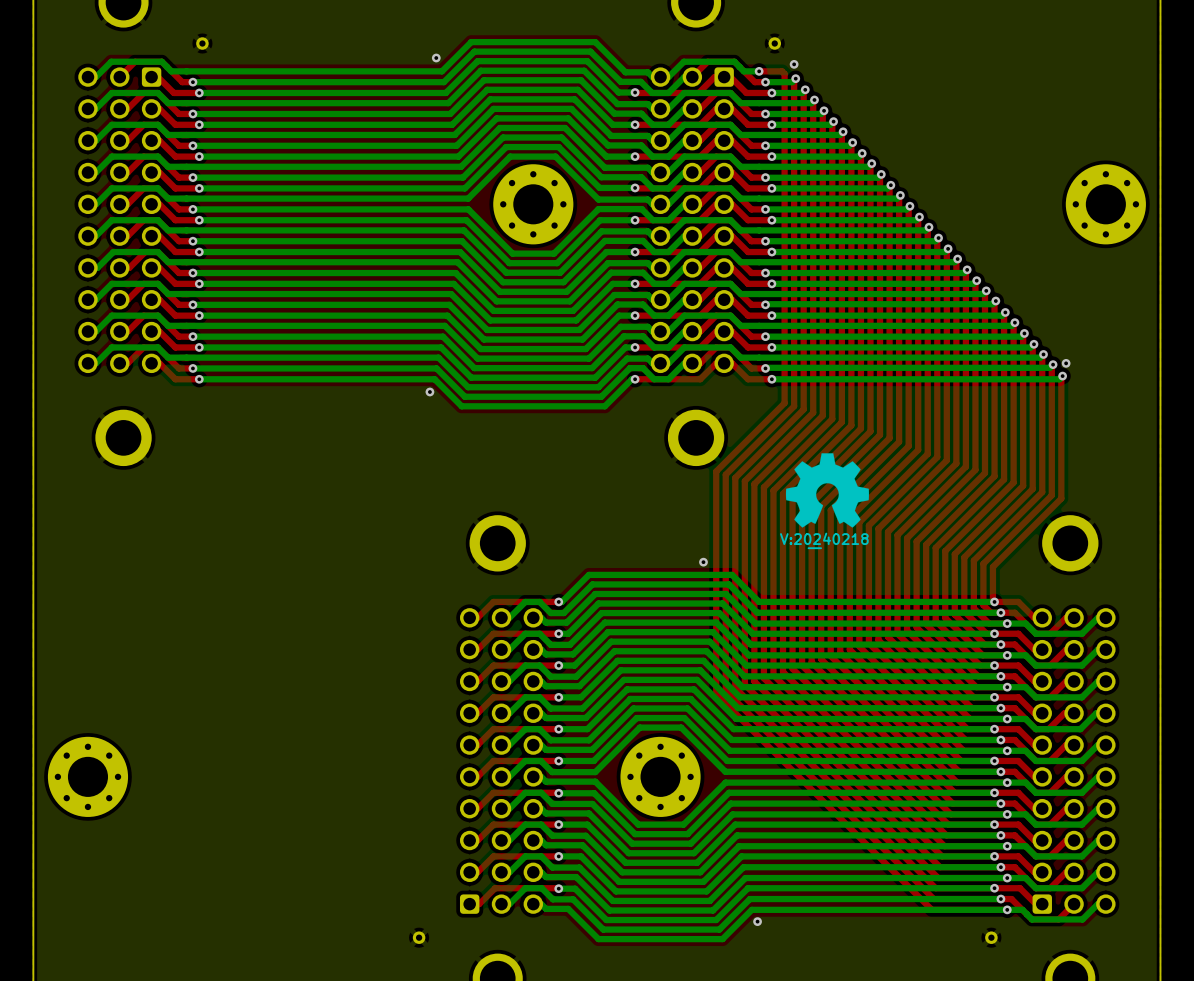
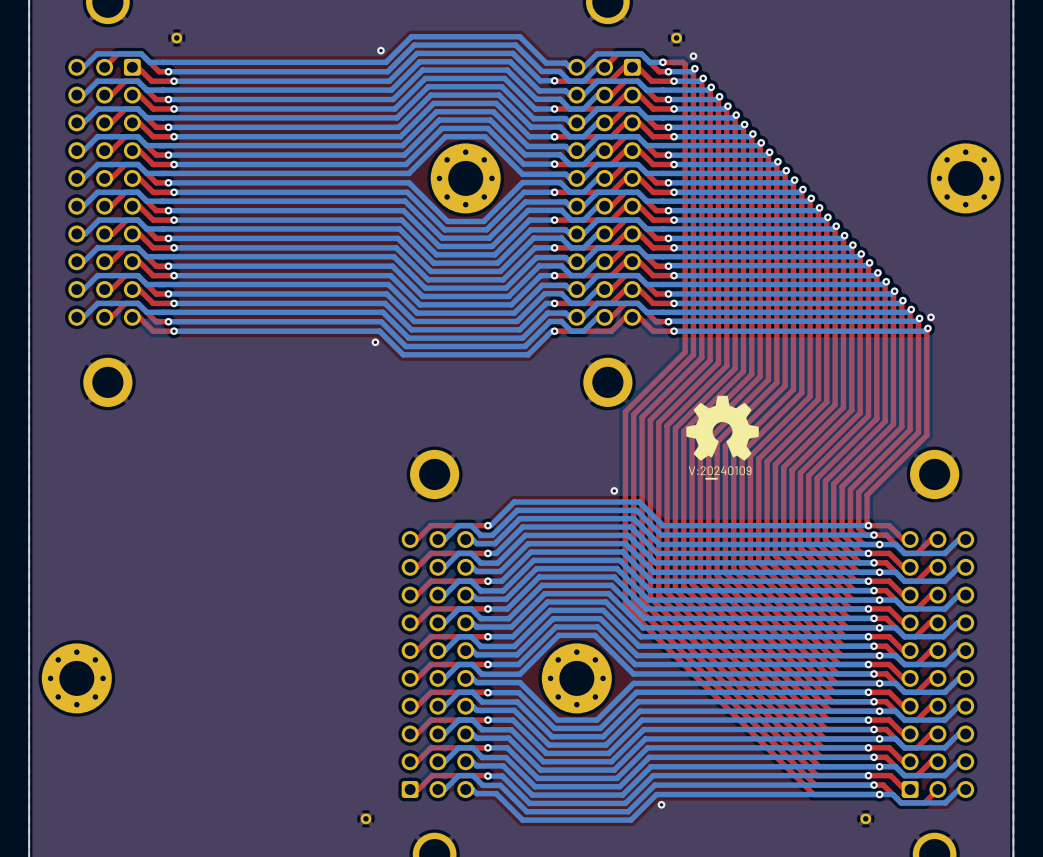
drawing shape: [780, 532, 869, 550] -> [688, 466, 752, 480]

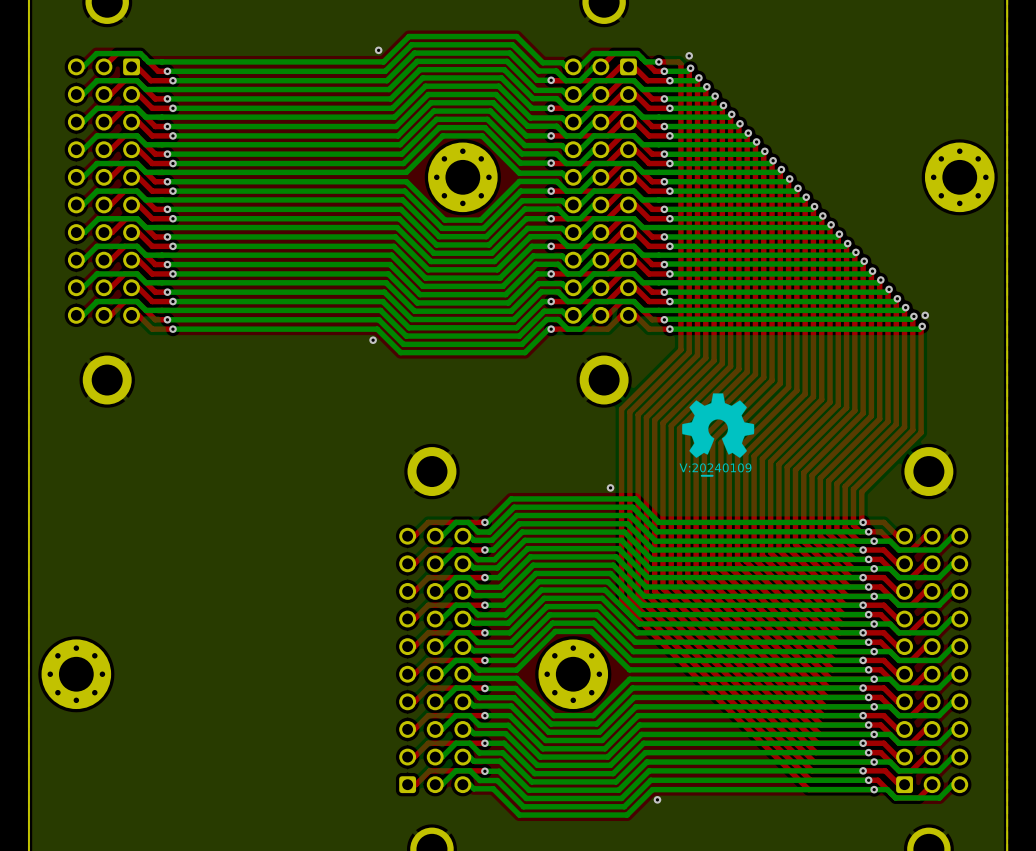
part: (176, 38) -> none
part: (676, 38) -> none
part: (365, 818) -> none
part: (865, 818) -> none

